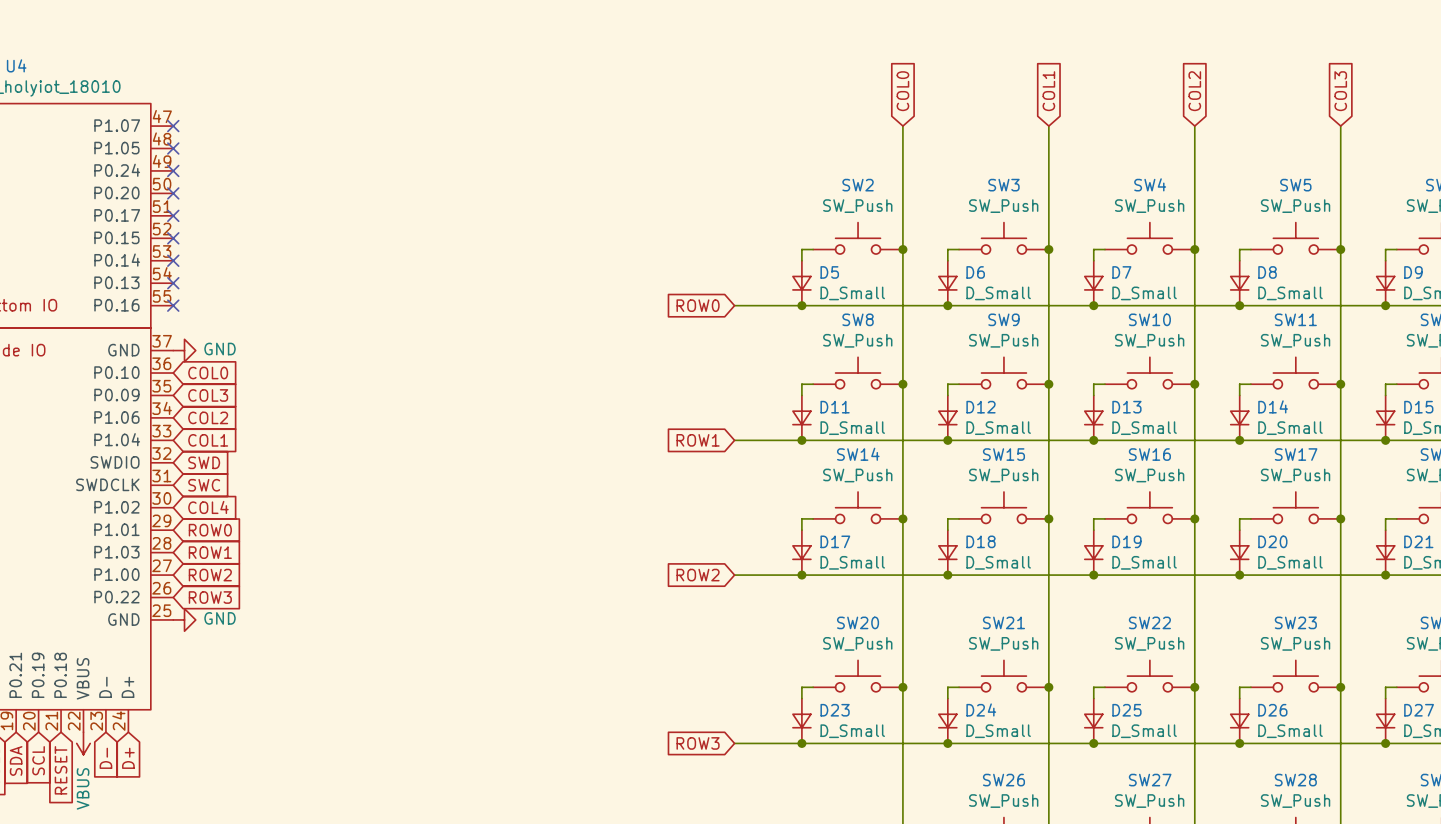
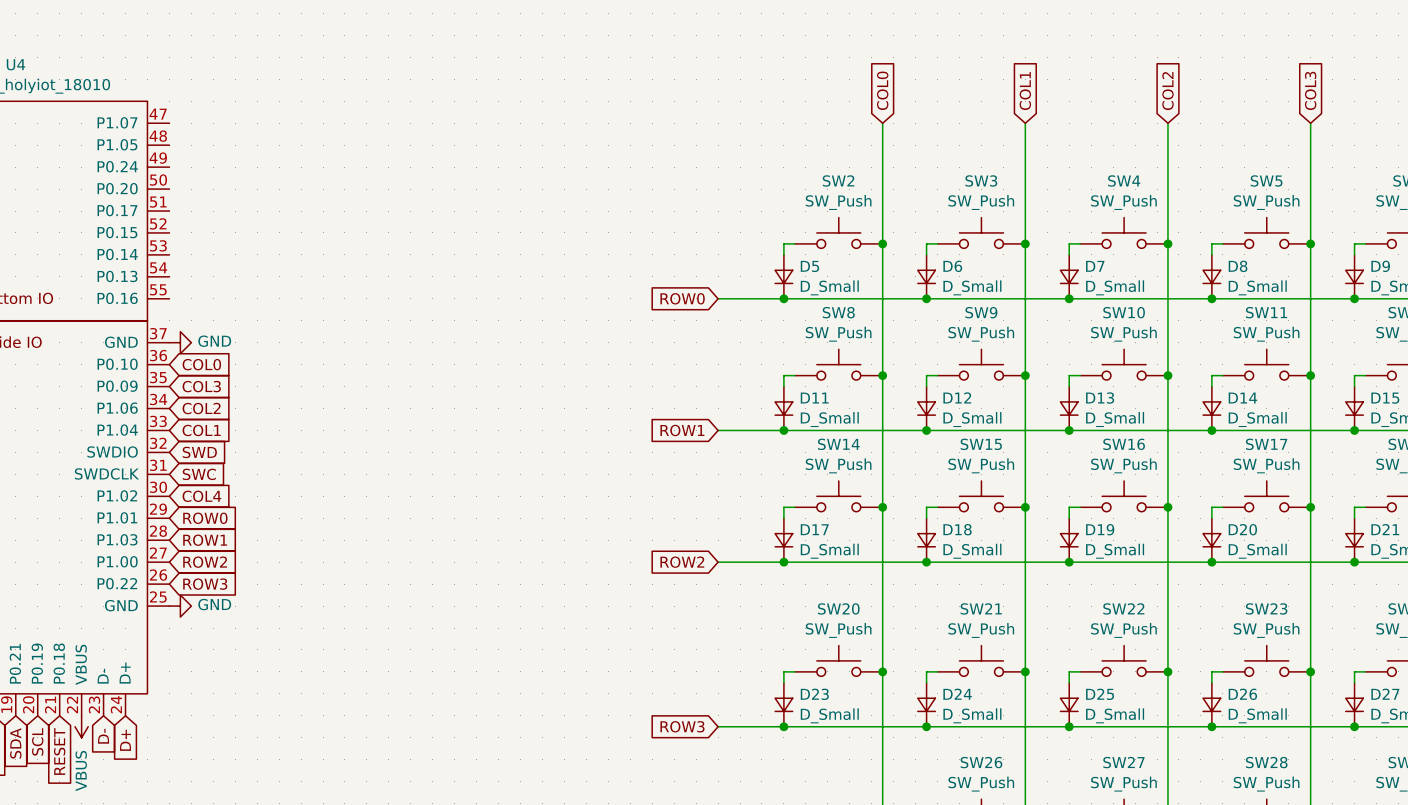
no-connect mark: (173, 126) -> none
no-connect mark: (173, 148) -> none
no-connect mark: (173, 170) -> none
no-connect mark: (173, 193) -> none
no-connect mark: (173, 215) -> none
no-connect mark: (173, 238) -> none
no-connect mark: (173, 260) -> none
no-connect mark: (173, 283) -> none
no-connect mark: (173, 305) -> none

